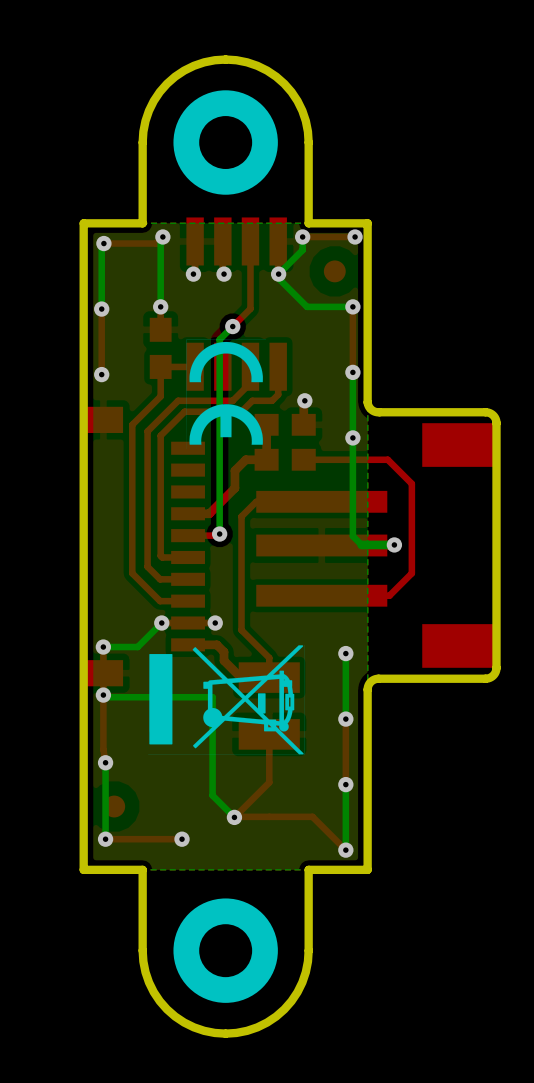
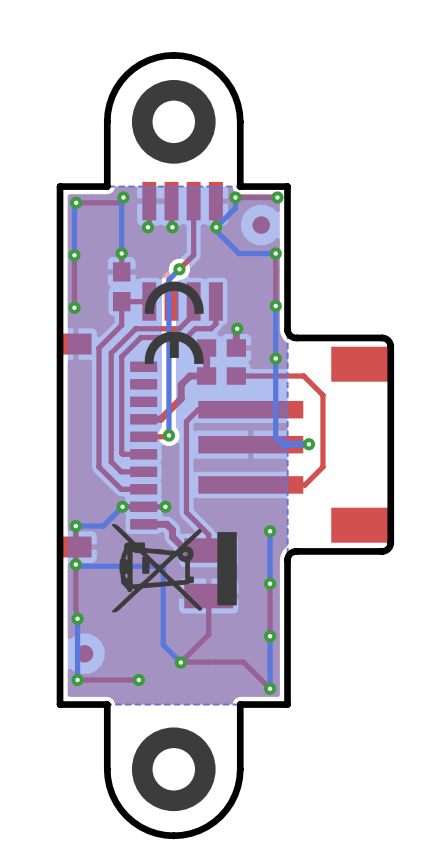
drawing shape: [186, 339, 267, 449] -> [144, 281, 204, 364]
drawing shape: [148, 645, 305, 755] -> [111, 524, 237, 613]

